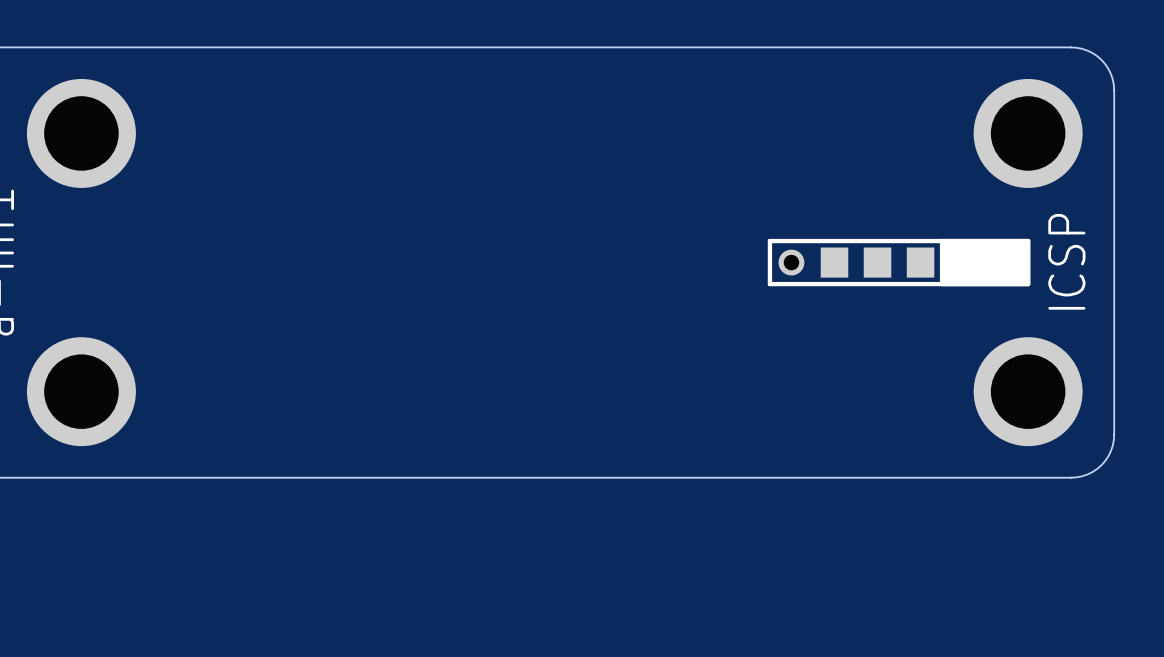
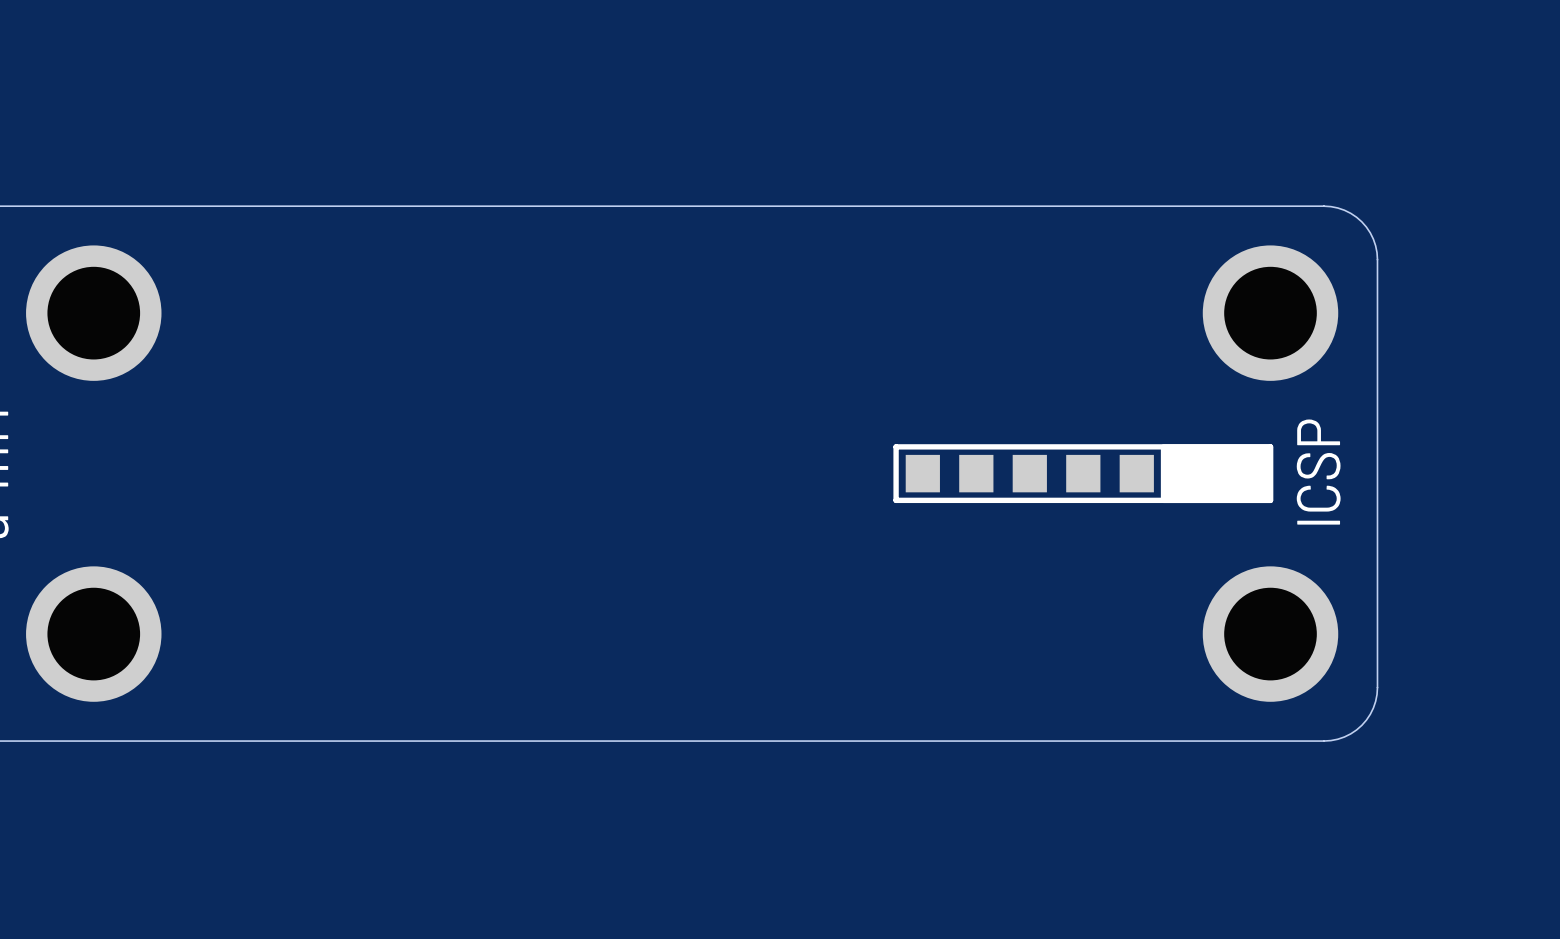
ICSP footprint: [767, 238, 1031, 287] -> [893, 444, 1274, 504]

